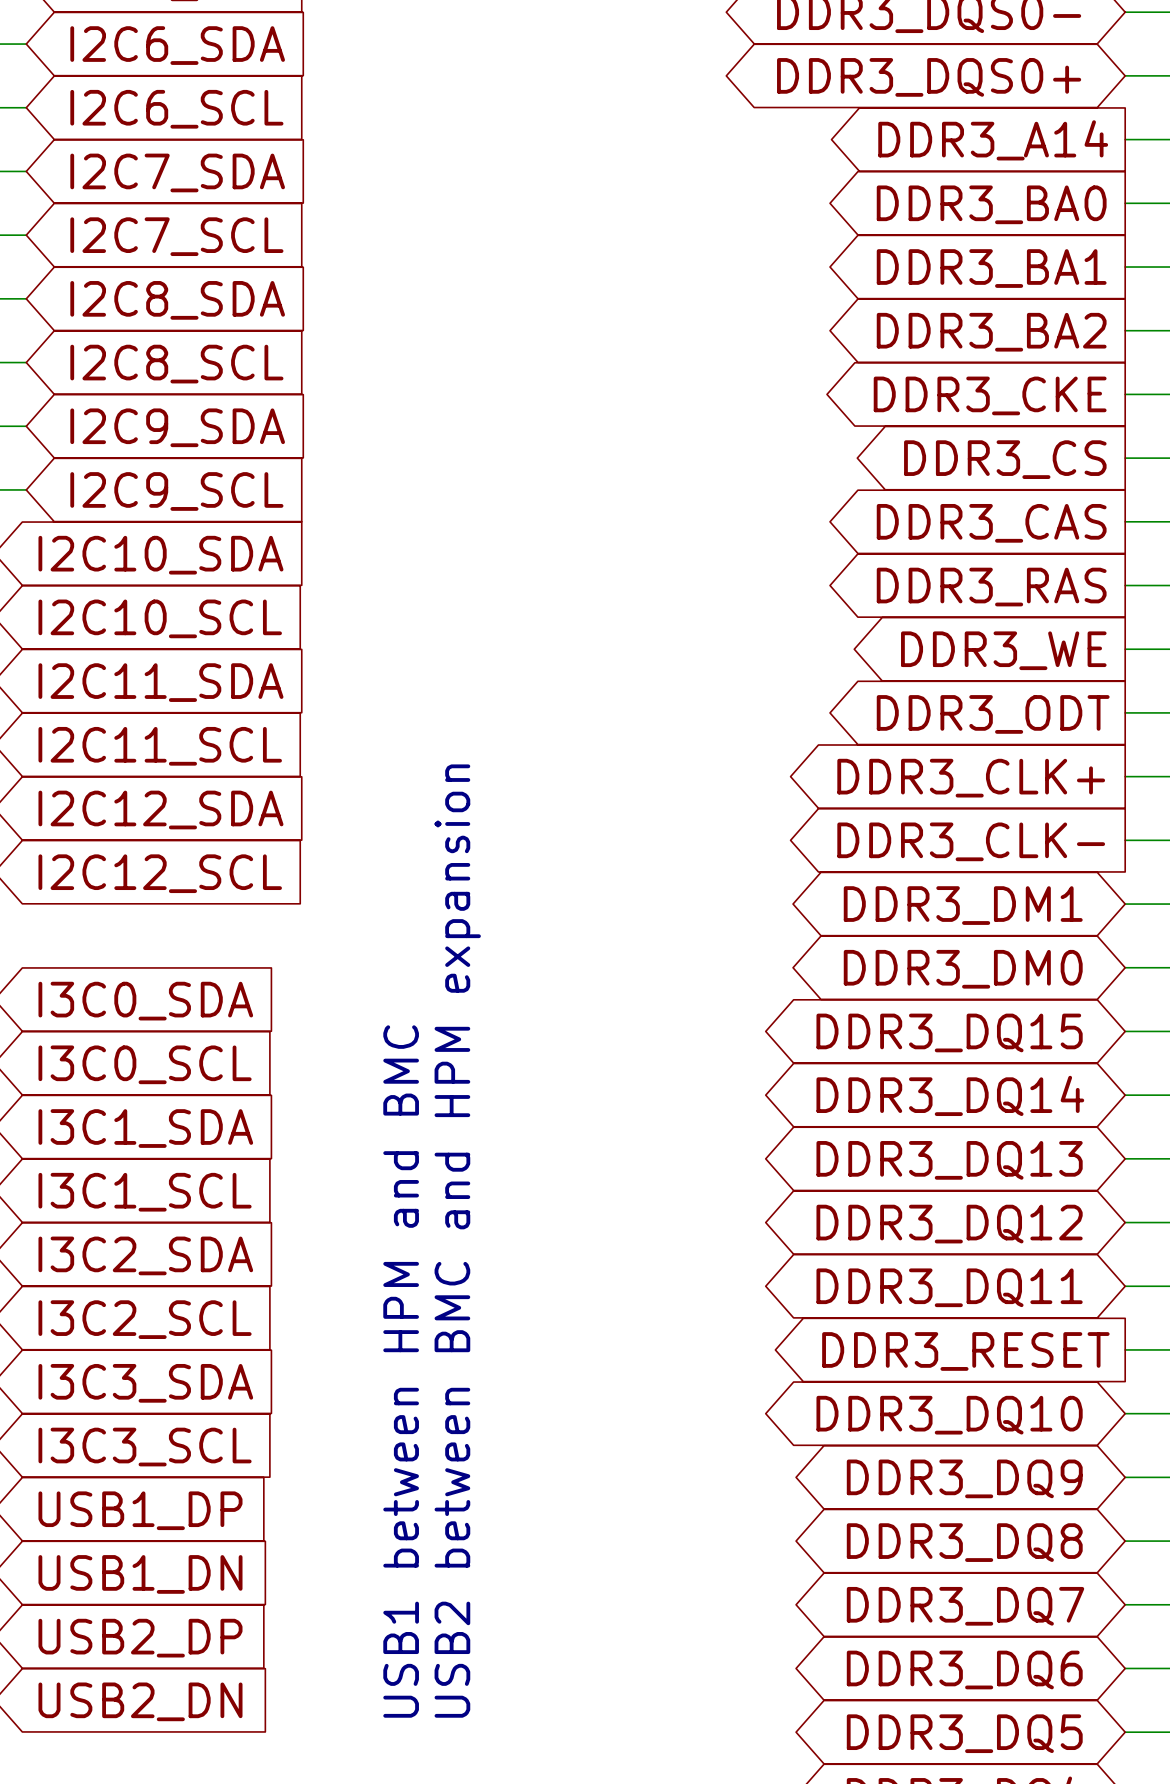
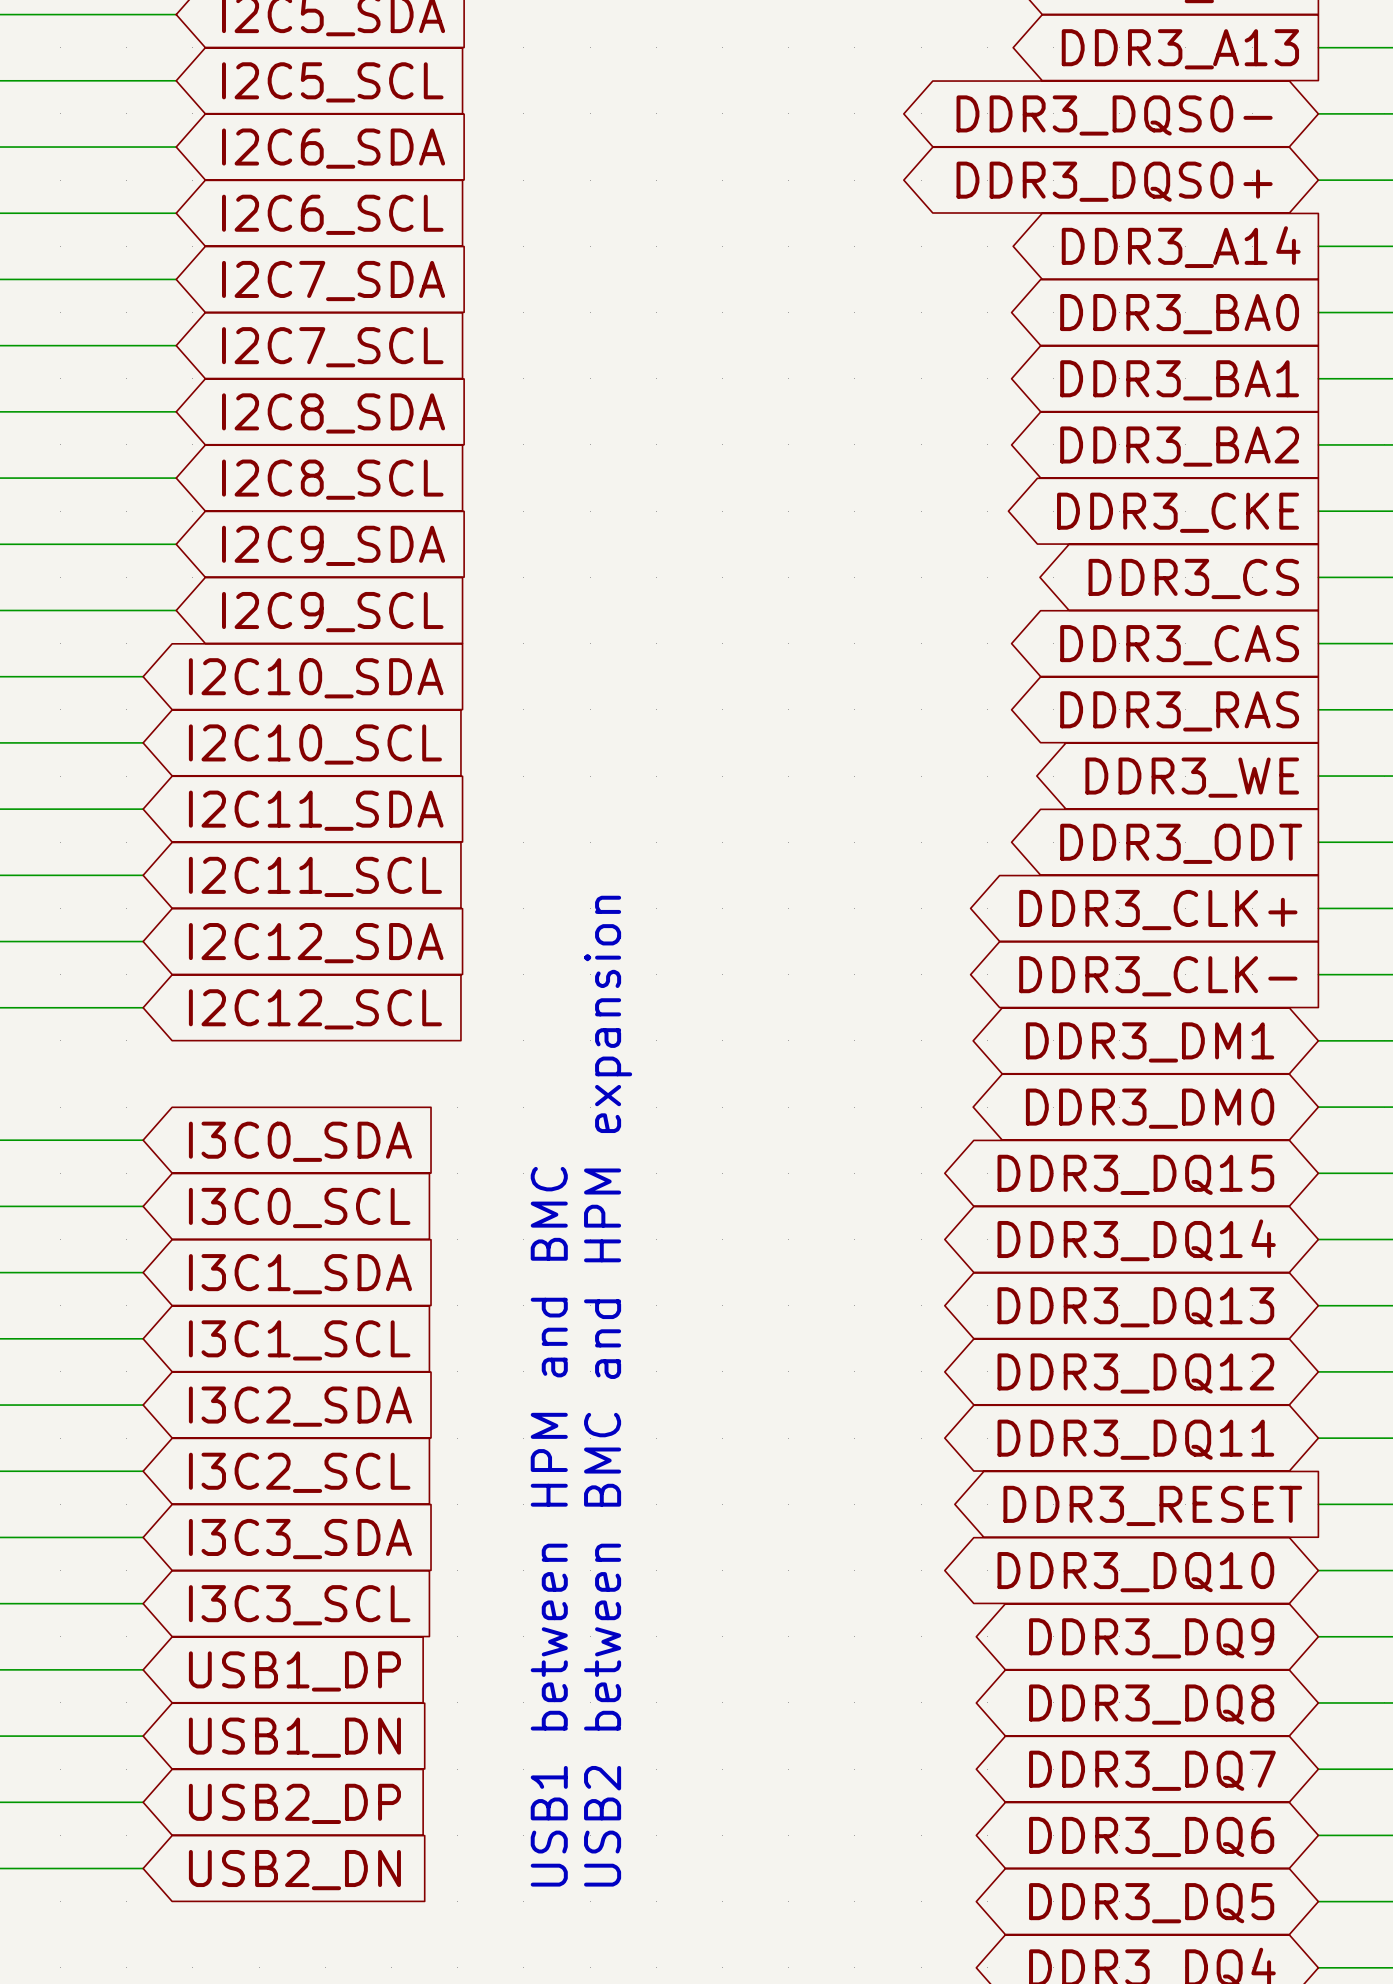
text position: USB2 between BMC and HPM expansion (457, 1241) -> USB2 between BMC and HPM expansion (608, 1391)
text position: USB1 between HPM and BMC (401, 1371) -> USB1 between HPM and BMC (549, 1526)

